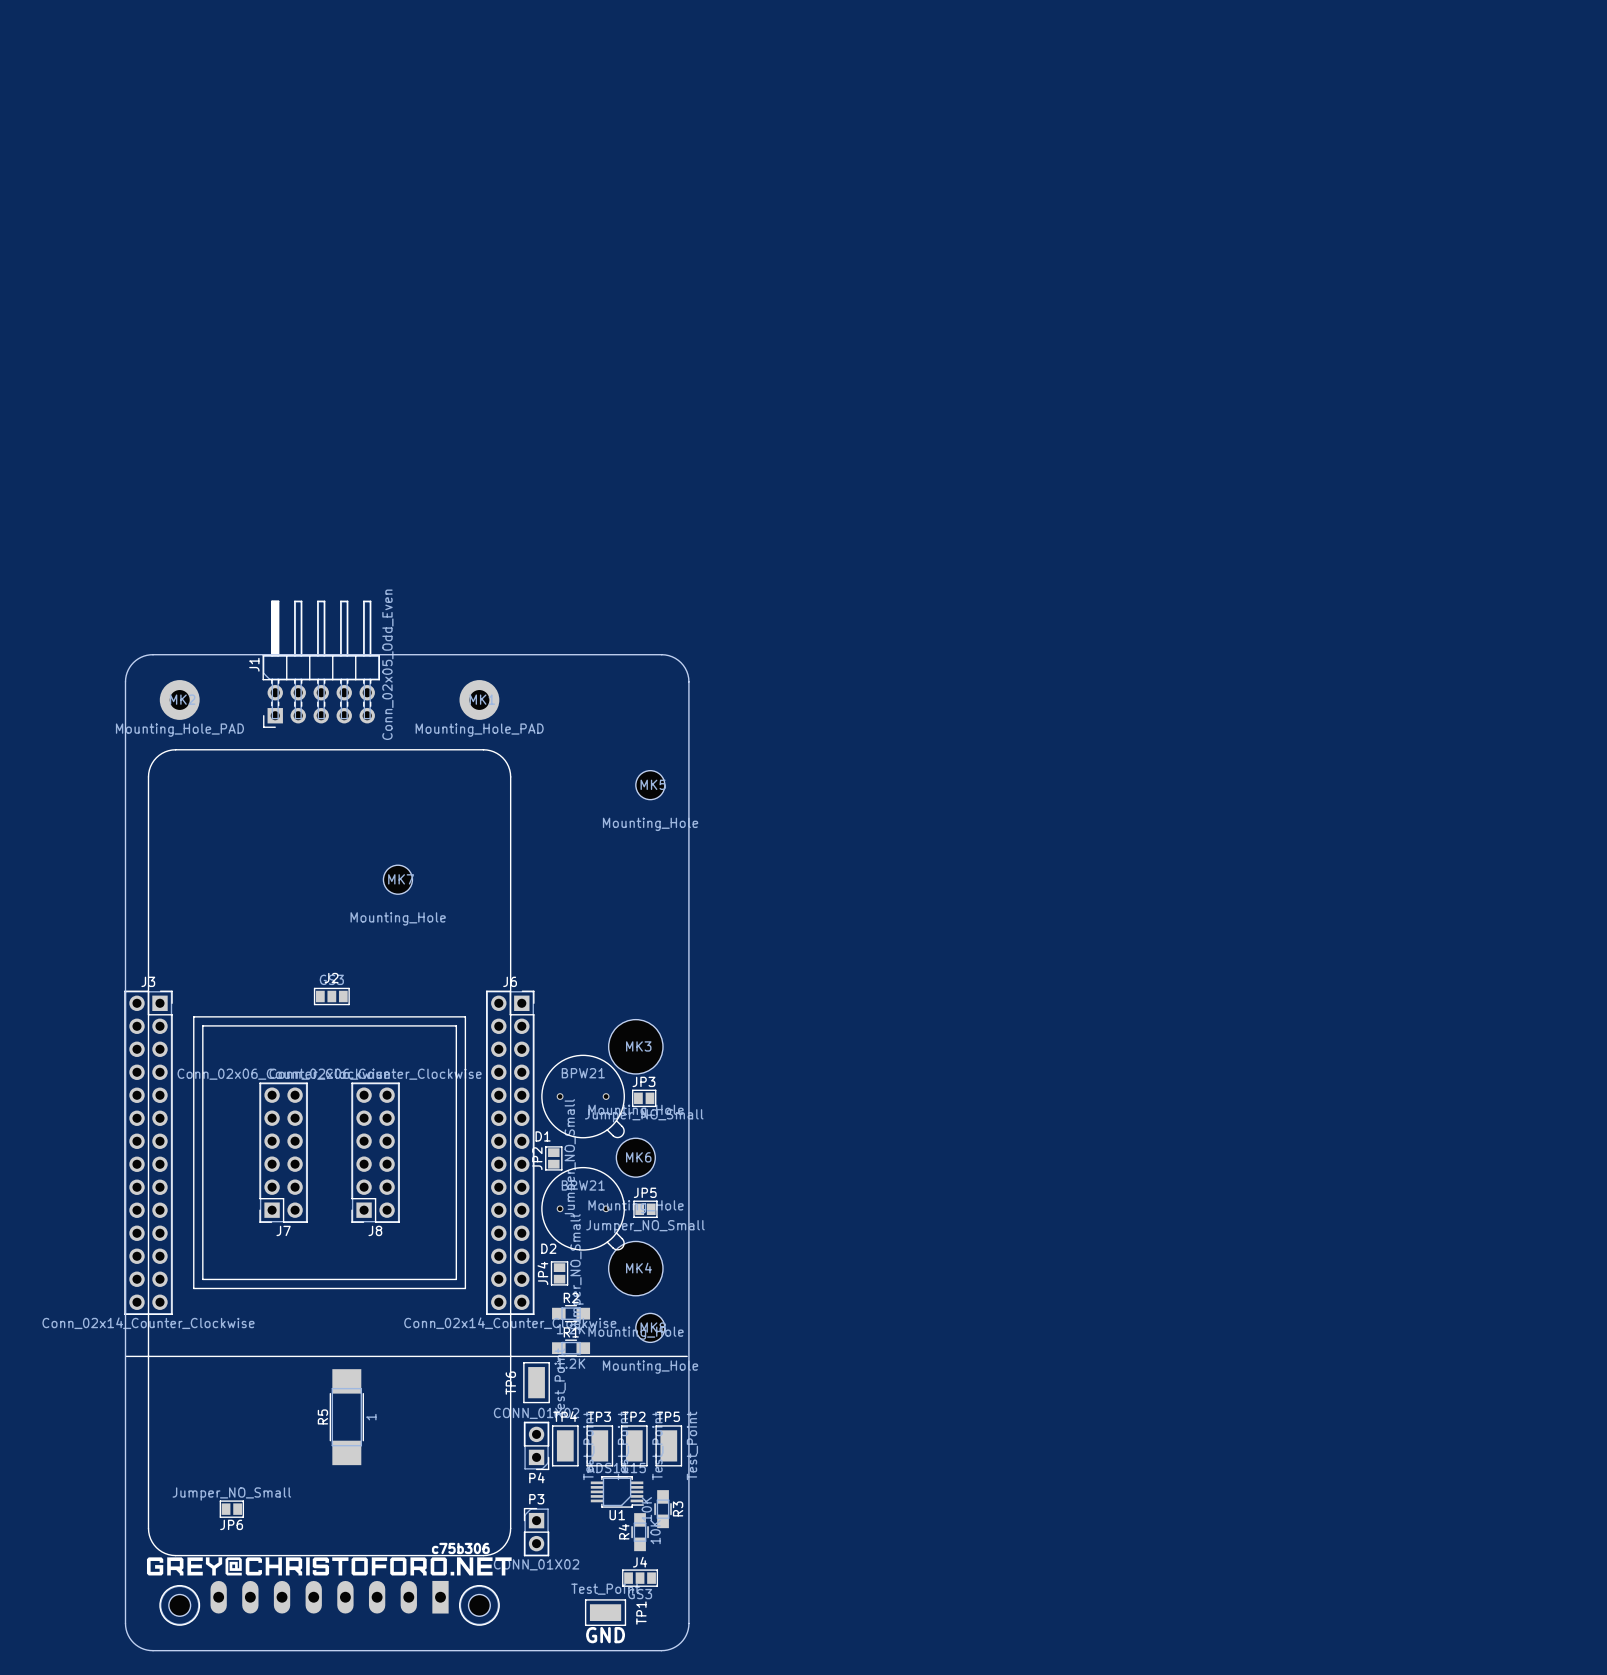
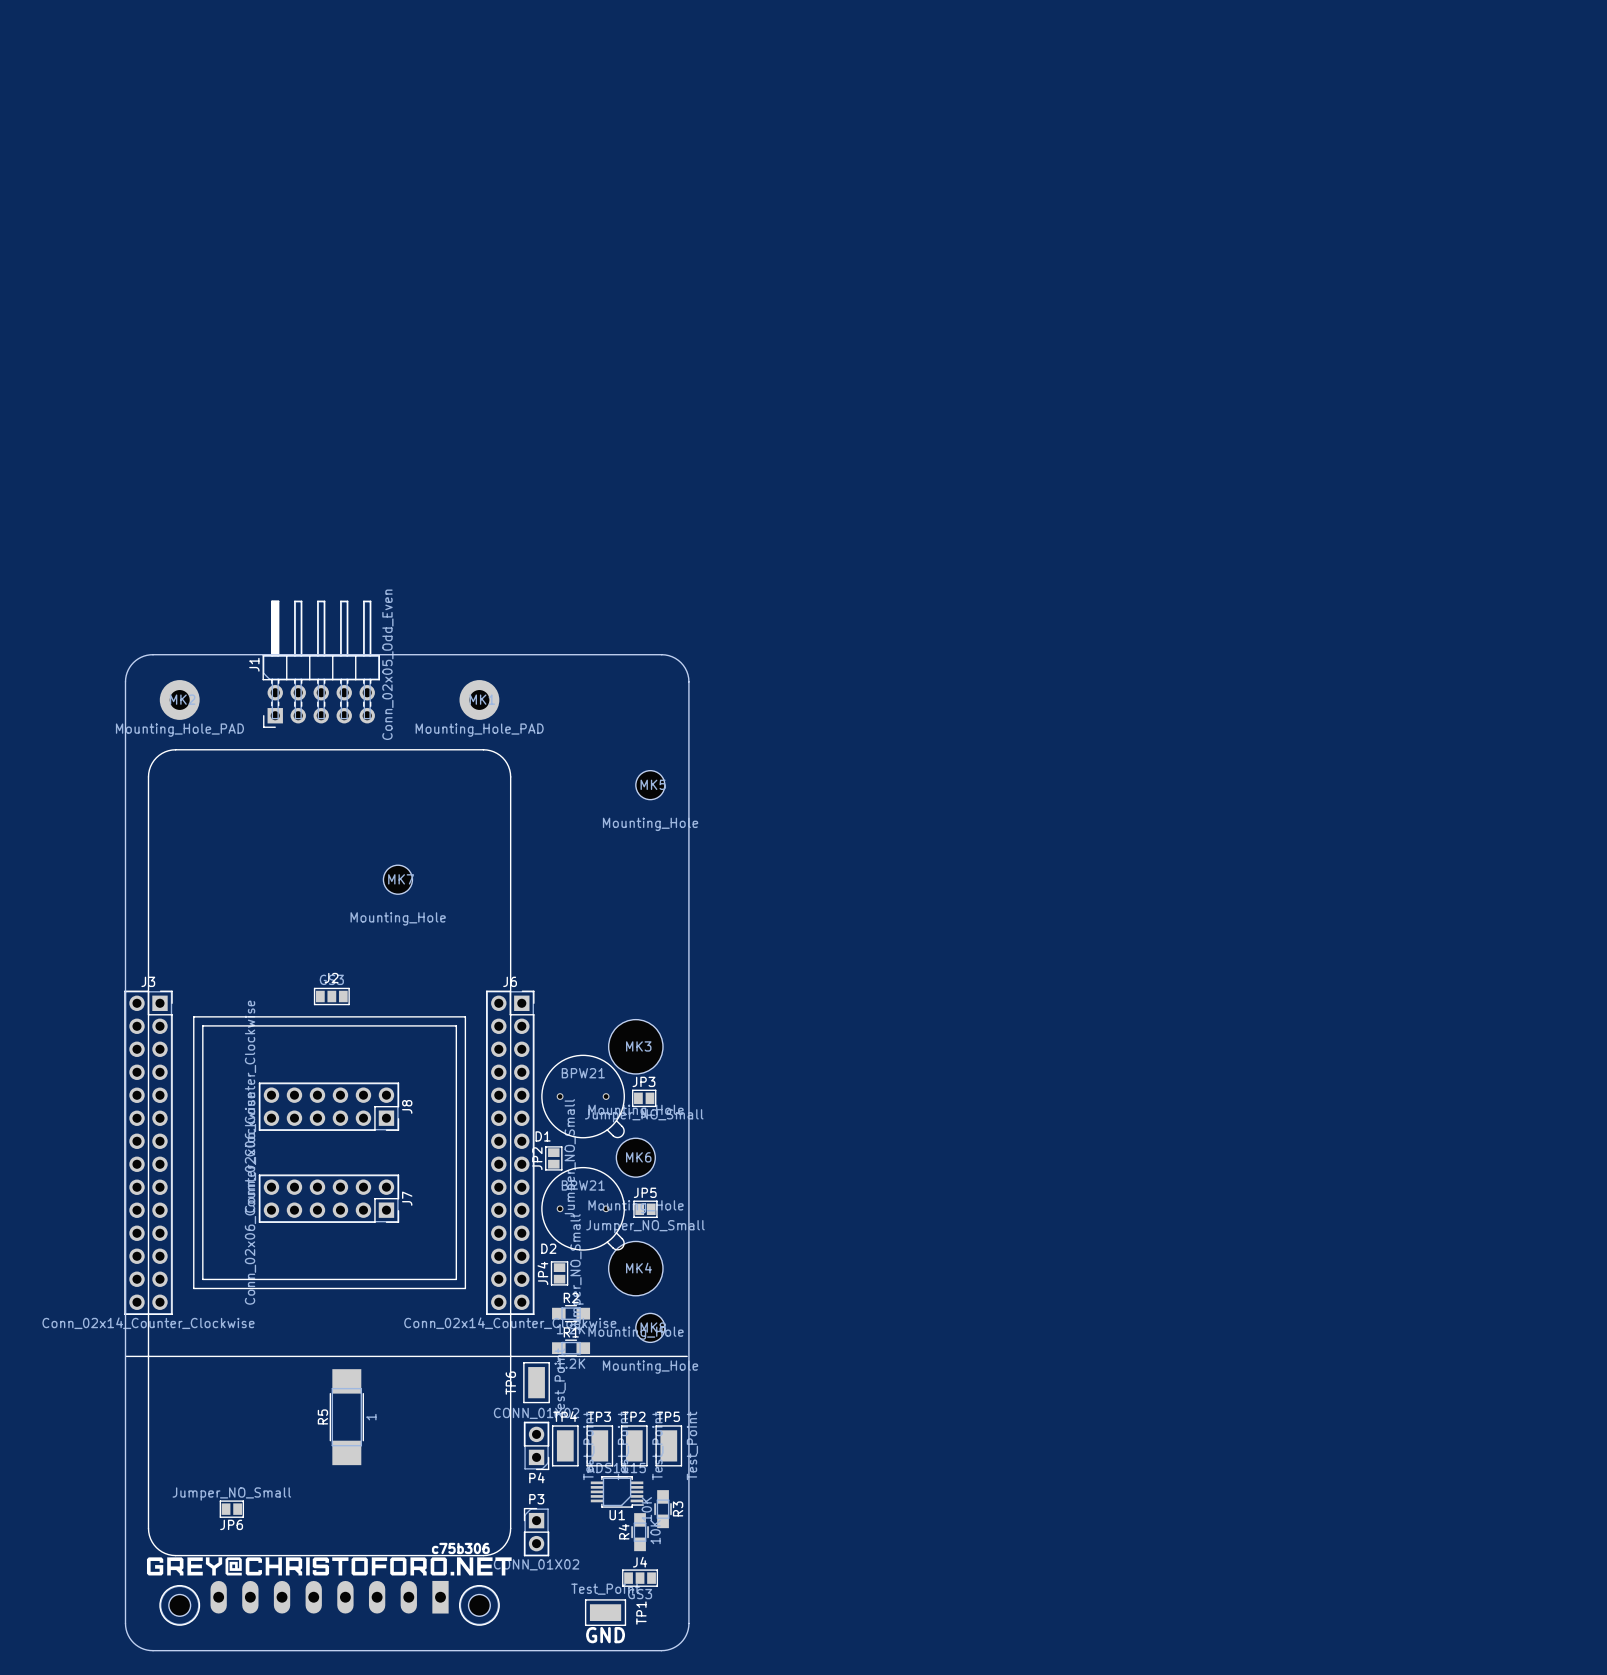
J7 rotation: 0° (283, 1152) -> 90° counterclockwise (328, 1198)
J8 rotation: 0° (375, 1152) -> 90° counterclockwise (328, 1106)

